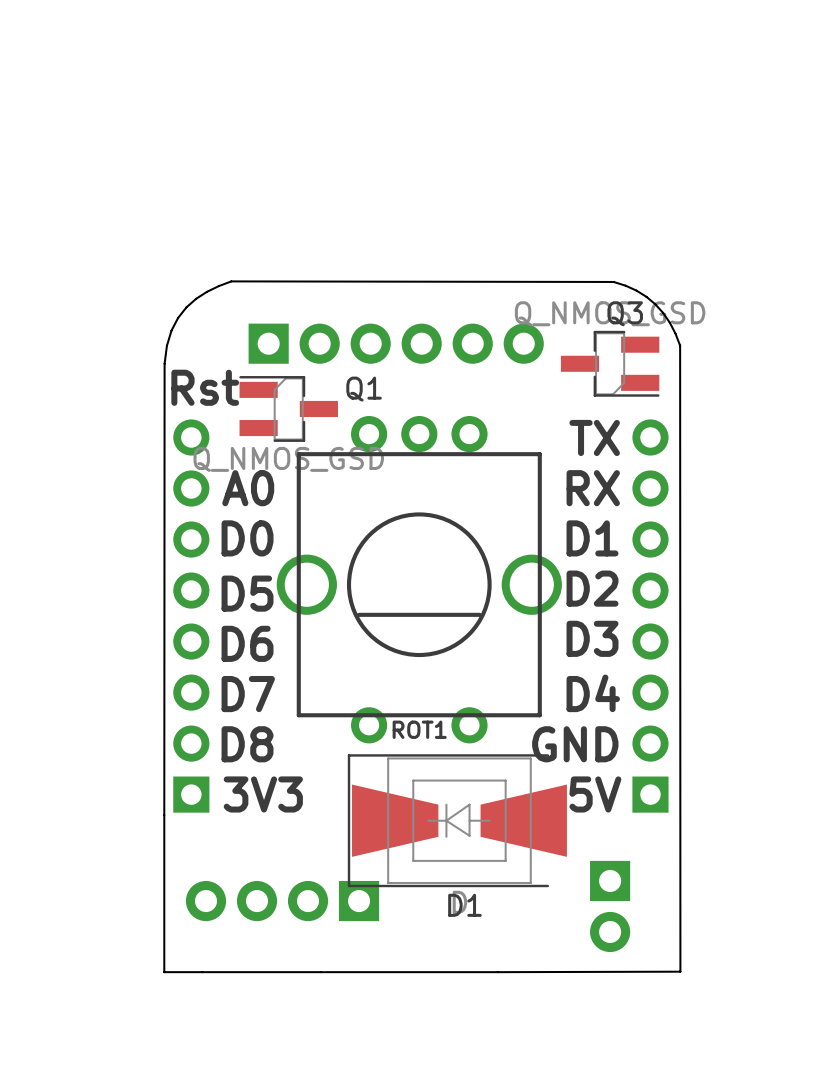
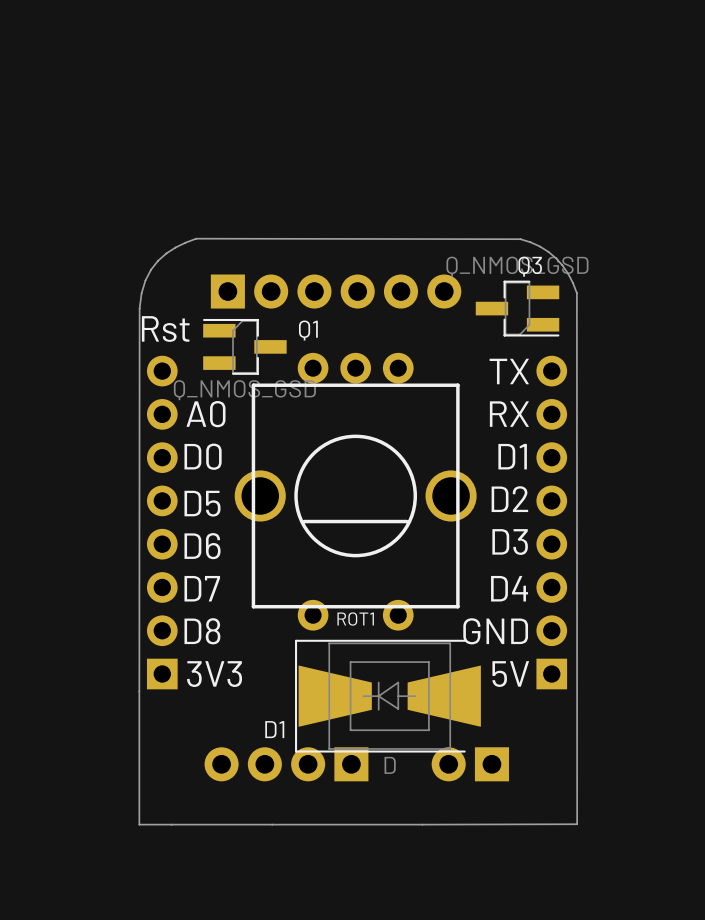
part position: (282, 901) -> (286, 764)
D1 name position: D1 (464, 905) -> D1 (274, 729)
part rotation: 0° (610, 906) -> 90° clockwise (470, 764)
part position: (610, 906) -> (470, 764)

